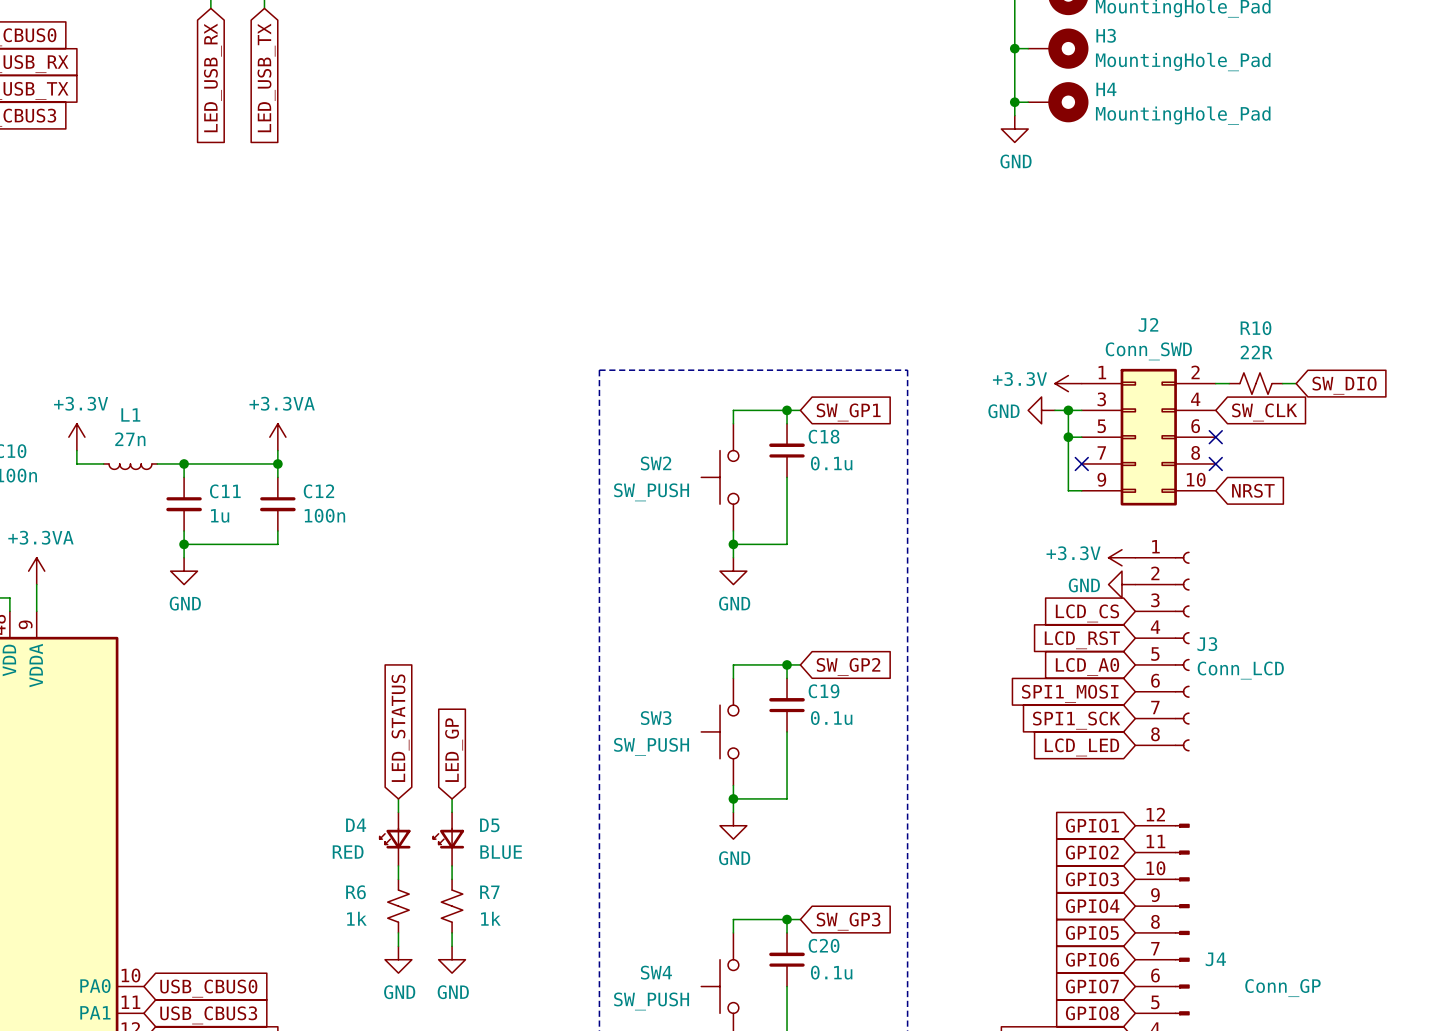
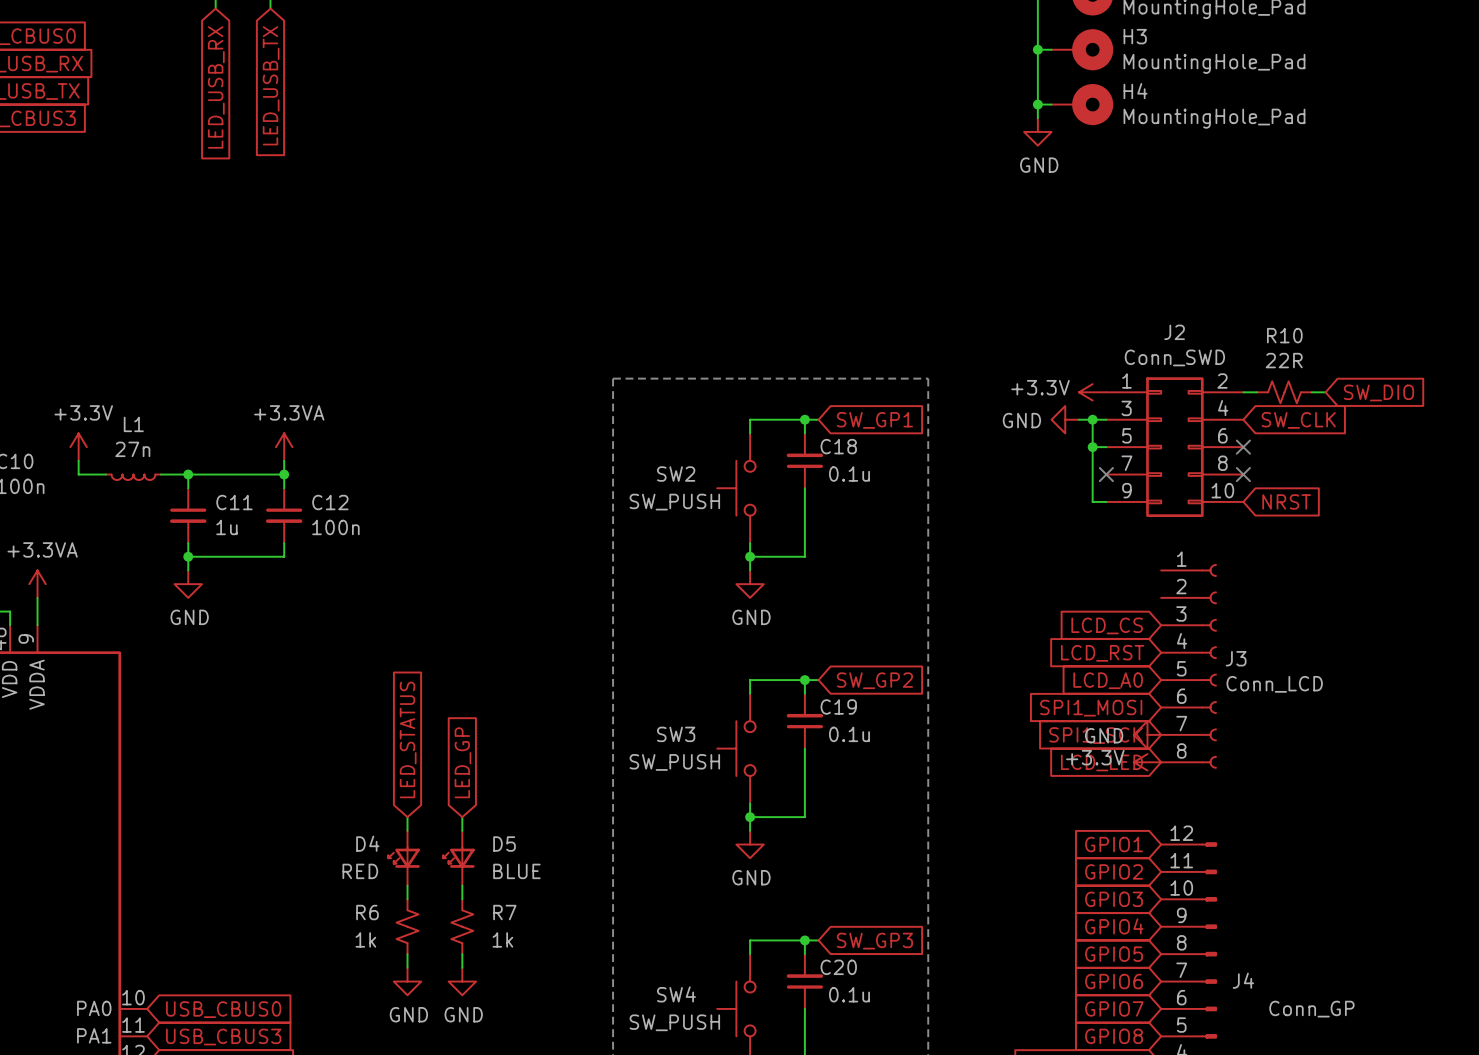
power symbol position: +3.3V (1121, 557) -> +3.3V (1147, 762)
power symbol position: GND (1121, 584) -> GND (1147, 734)

